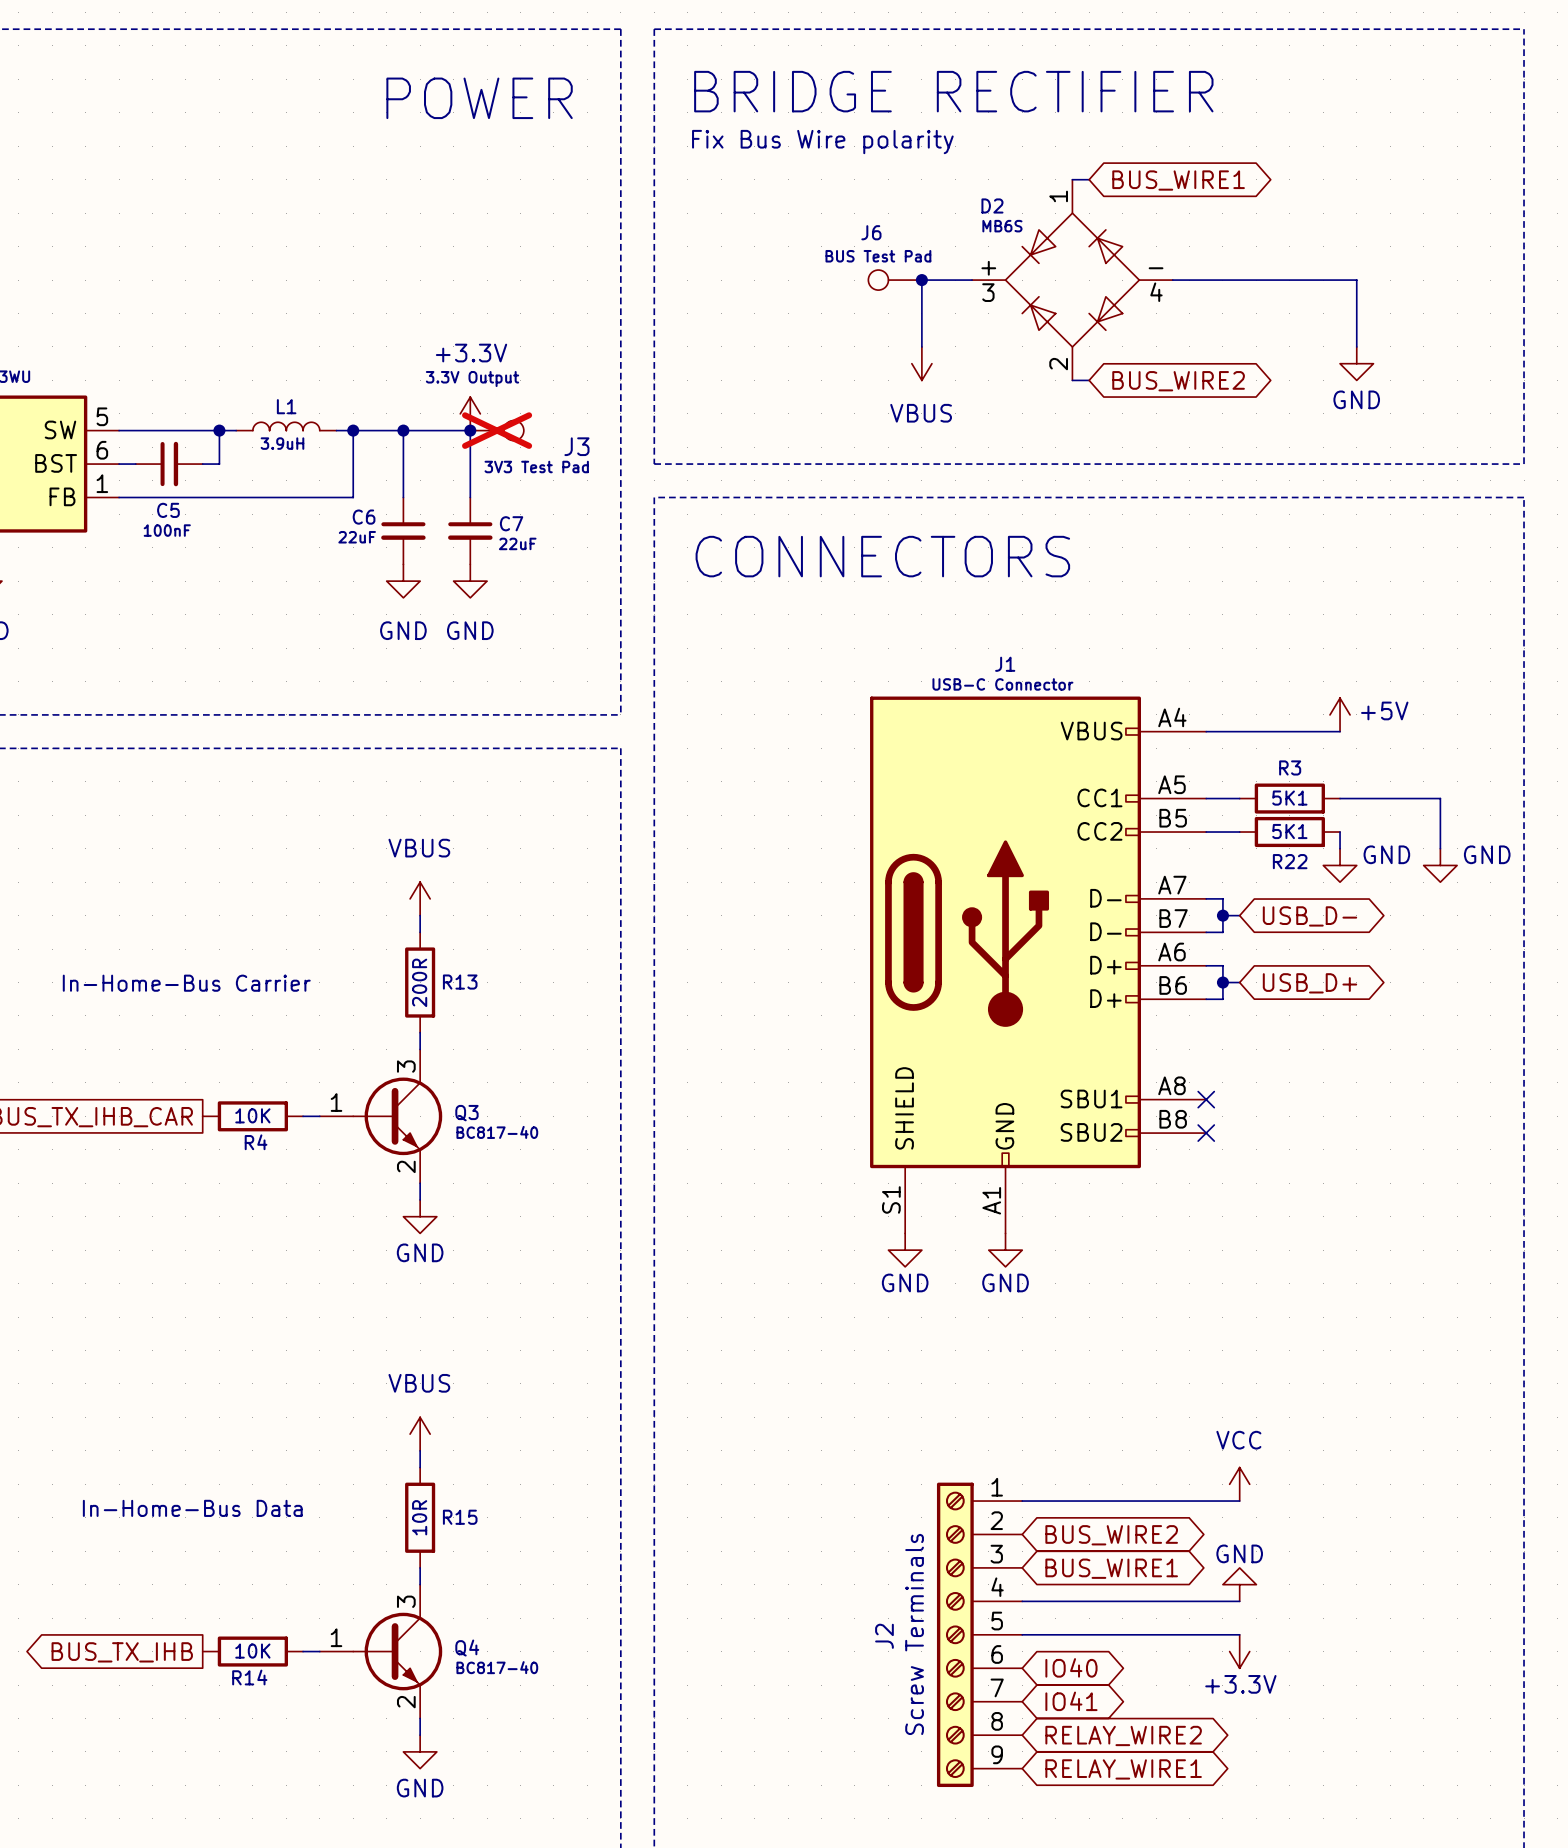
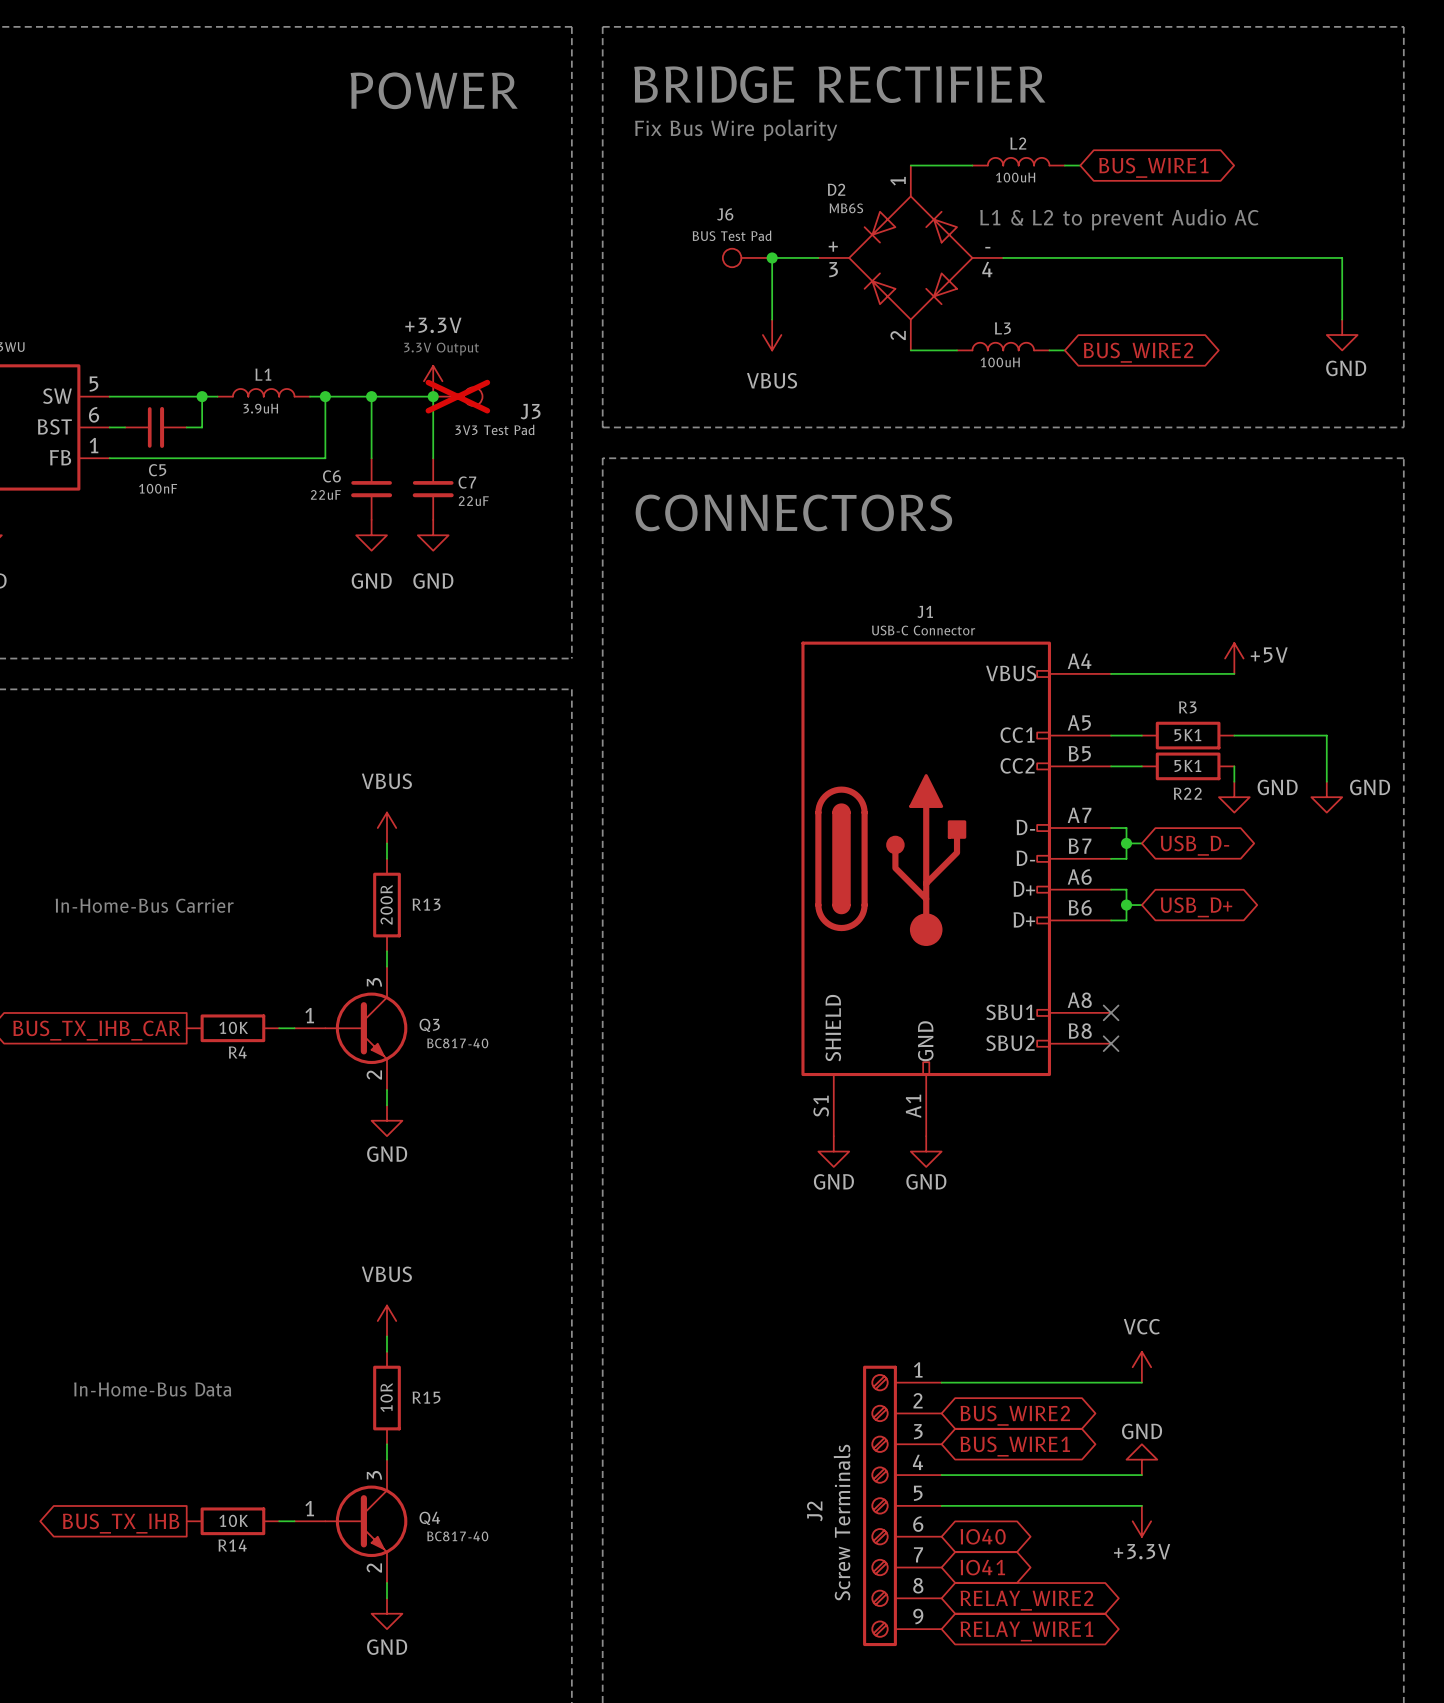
L2: none -> 100uH (1018, 161)
wire: none -> (910, 165) (972, 165)
wire: (1072, 179) (1089, 179) -> (1064, 165) (1080, 165)
global label position: BUS_WIRE1 (1178, 180) -> BUS_WIRE1 (1153, 167)
text: none -> L1 & L2 to prevent Audio AC (1119, 219)
junction: none -> (772, 257)
J6 position: (895, 280) -> (747, 257)
junction: (921, 280) -> none
wire: (972, 280) (921, 280) (921, 346) -> (818, 257) (772, 257) (772, 319)
D2 position: (1072, 280) -> (910, 257)
wire: none -> (1003, 257) (1080, 257)
wire: (1356, 280) (1356, 346) -> (1249, 257) (1342, 257) (1342, 319)
power symbol position: VBUS (921, 363) -> VBUS (772, 335)
power symbol position: GND (1356, 363) -> GND (1342, 335)
L3: none -> 100uH (1003, 346)
wire: none -> (910, 350) (957, 350)
wire: (1072, 380) (1089, 380) -> (1049, 350) (1064, 350)
global label position: BUS_WIRE2 (1178, 381) -> BUS_WIRE2 (1138, 352)

